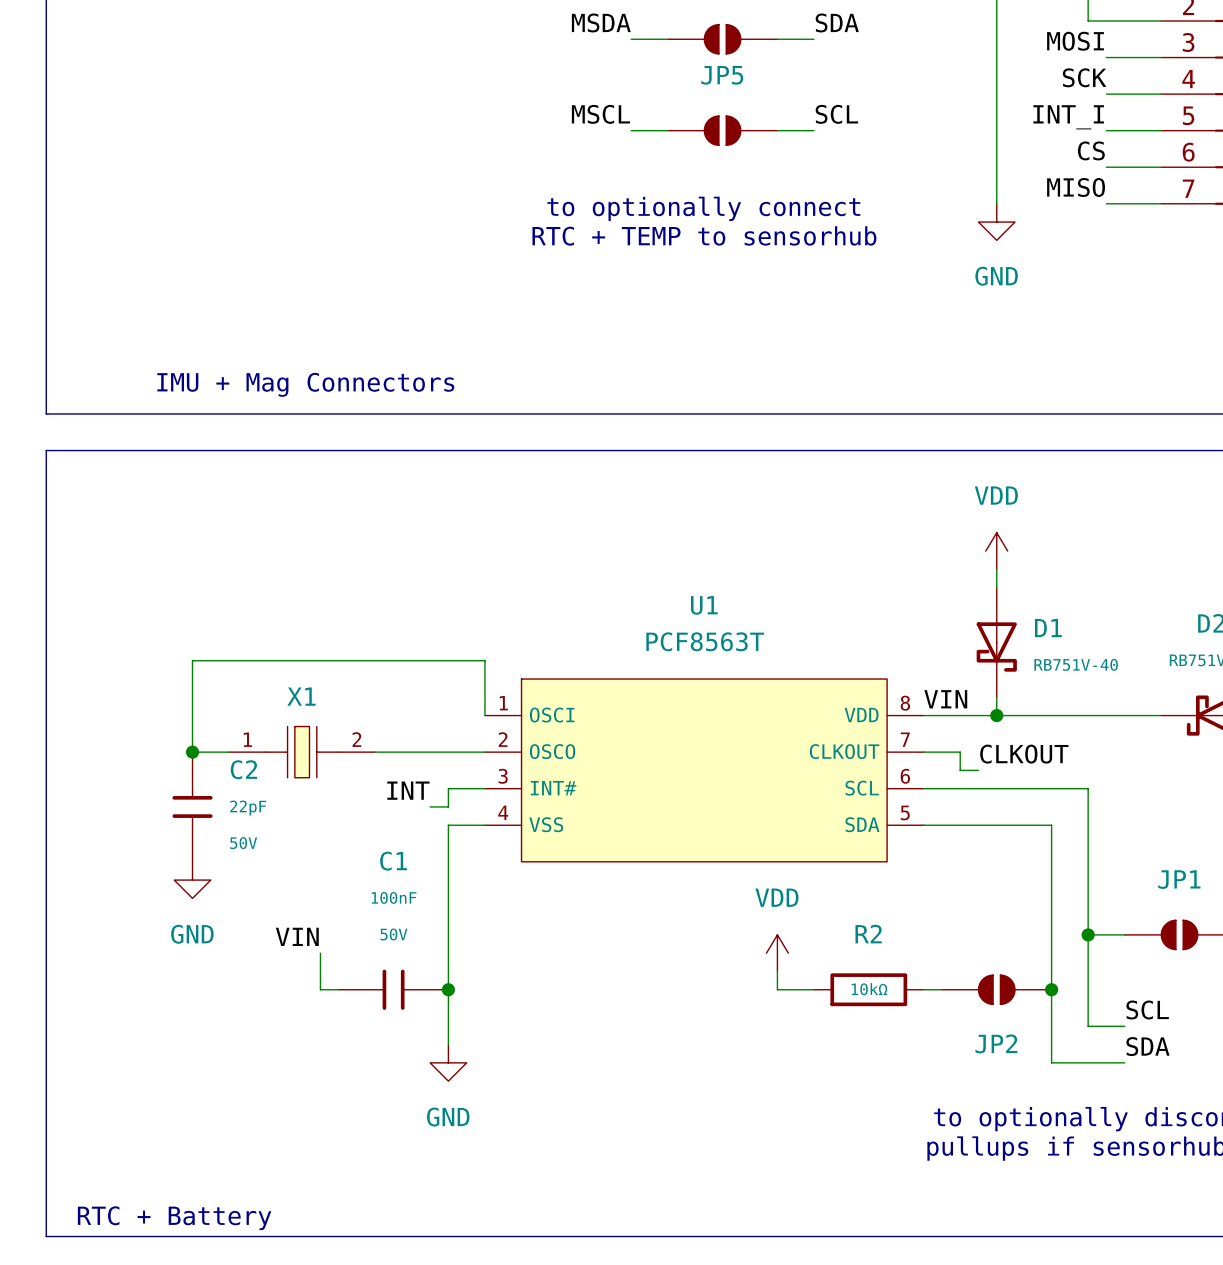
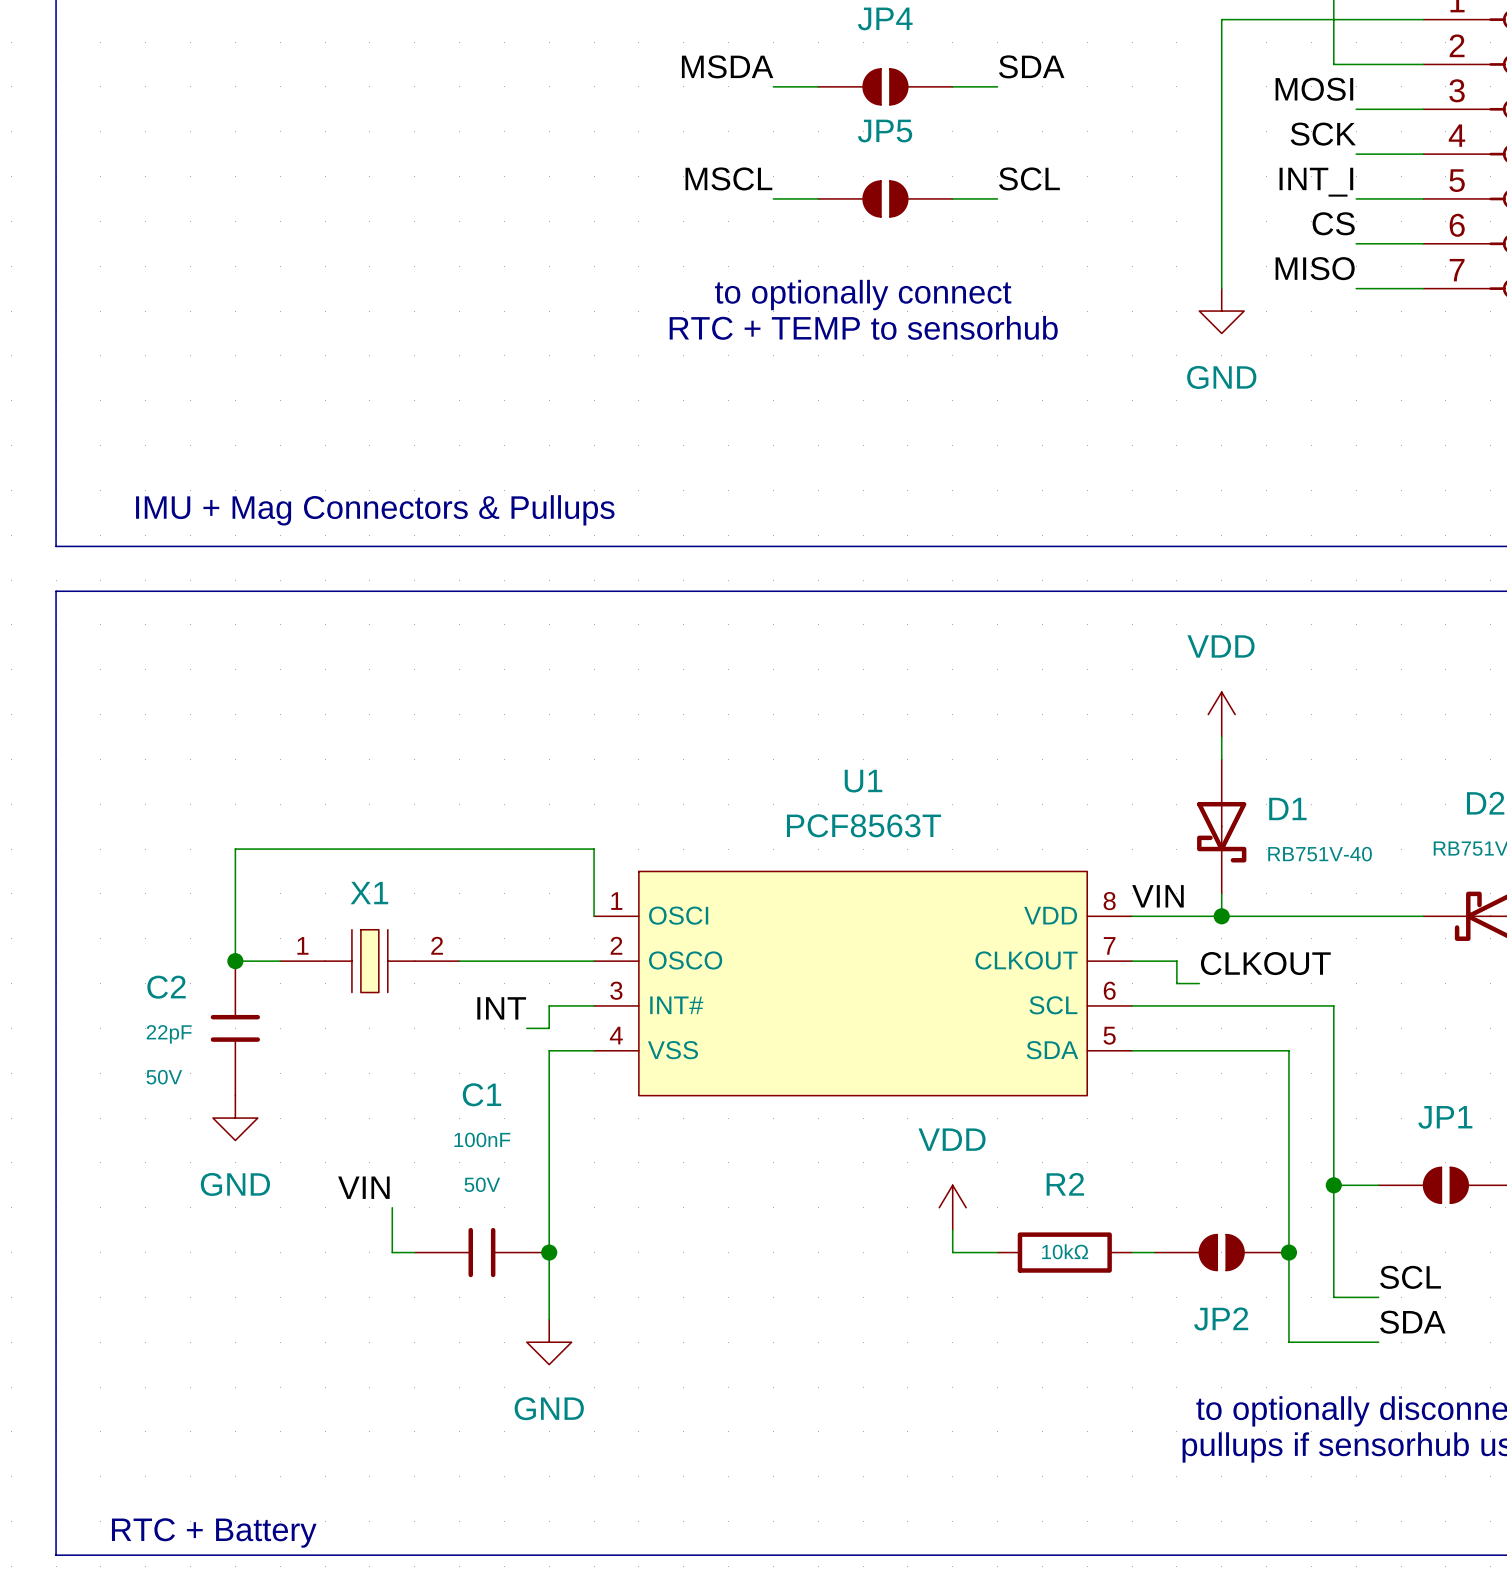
text: IMU + Mag Connectors (305, 384) -> IMU + Mag Connectors & Pullups (375, 510)
C2 name position: C2 (243, 769) -> C2 (166, 987)
C2 value position: 22pF (248, 808) -> 22pF (169, 1034)
C2 text position: 50V (243, 843) -> 50V (164, 1077)

